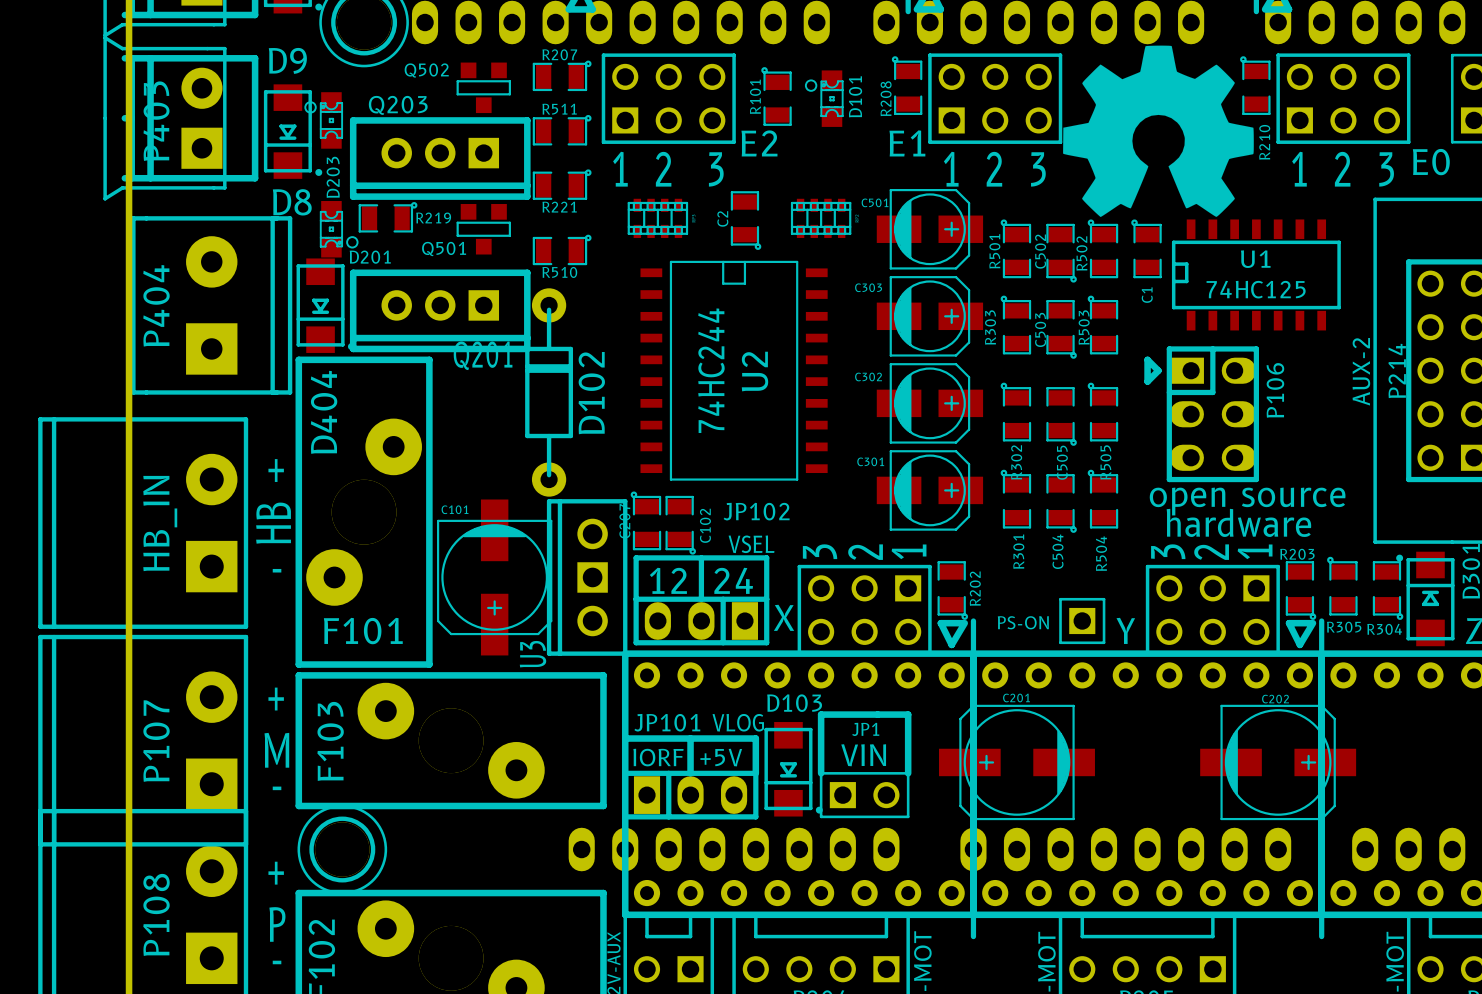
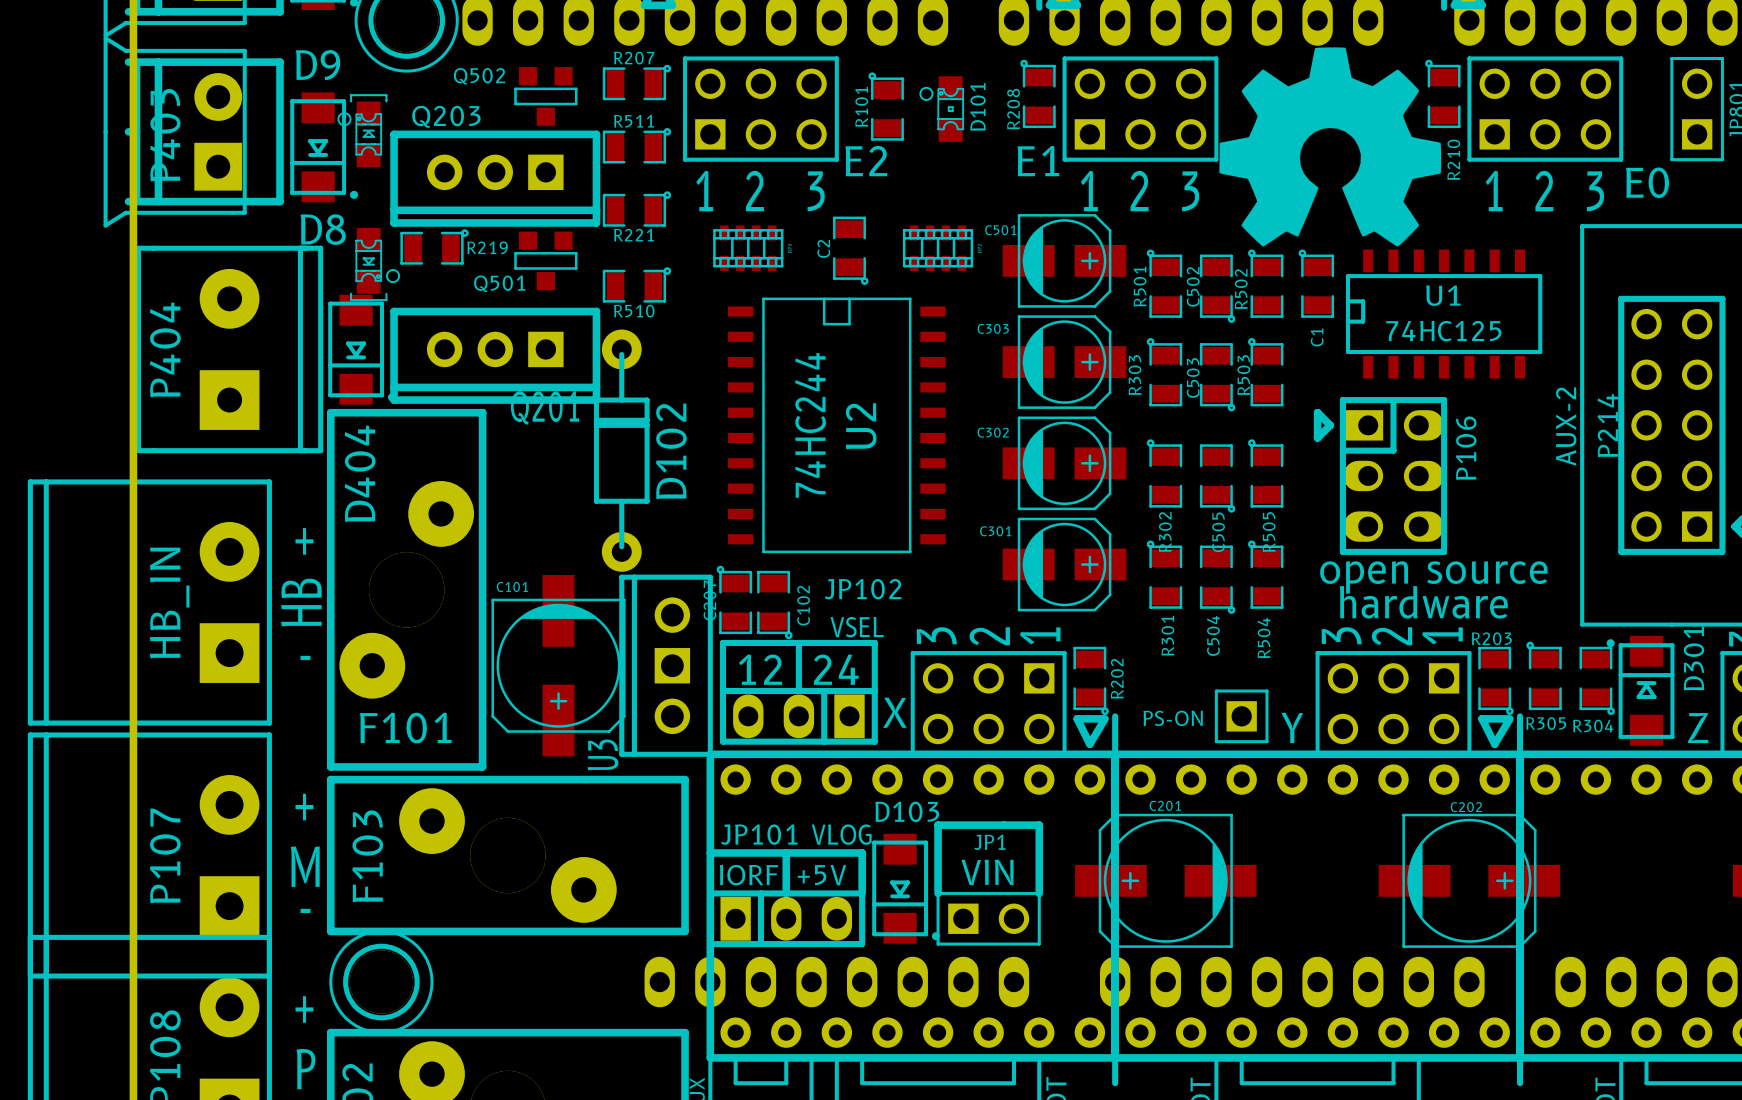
part: none -> (362, 130)
D203: (323, 120) -> none
D201: (339, 229) -> none
part: none -> (374, 264)

